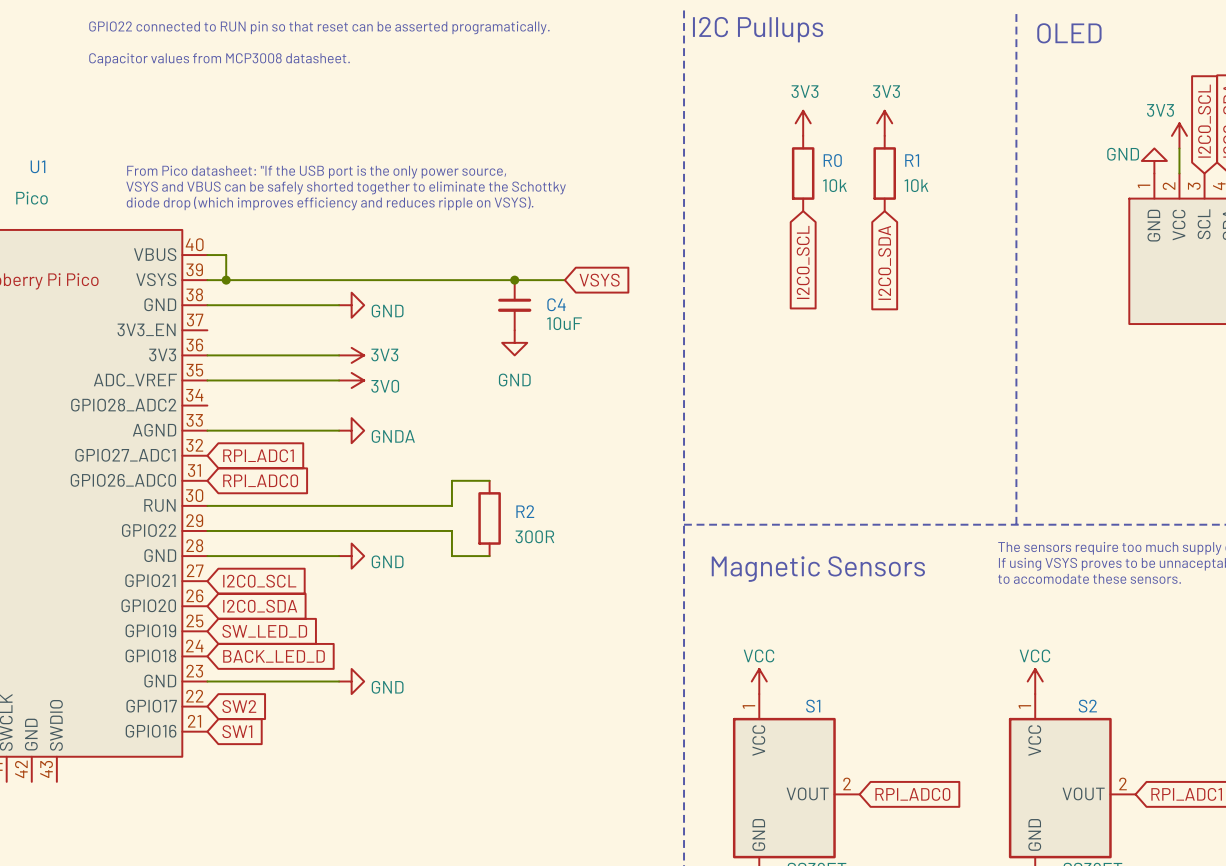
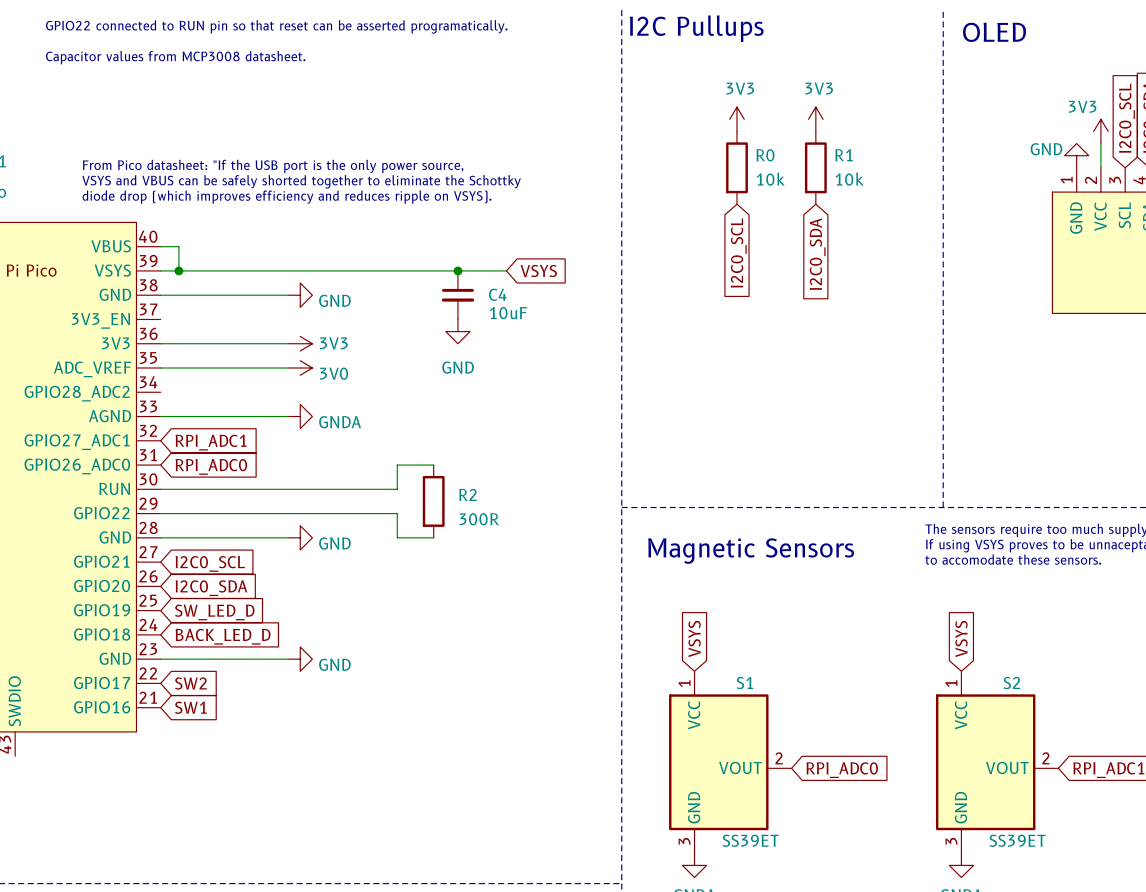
global label: none -> VSYS (694, 638)
global label: none -> VSYS (961, 638)
power symbol: VCC (759, 681) -> none
power symbol: VCC (1035, 681) -> none

